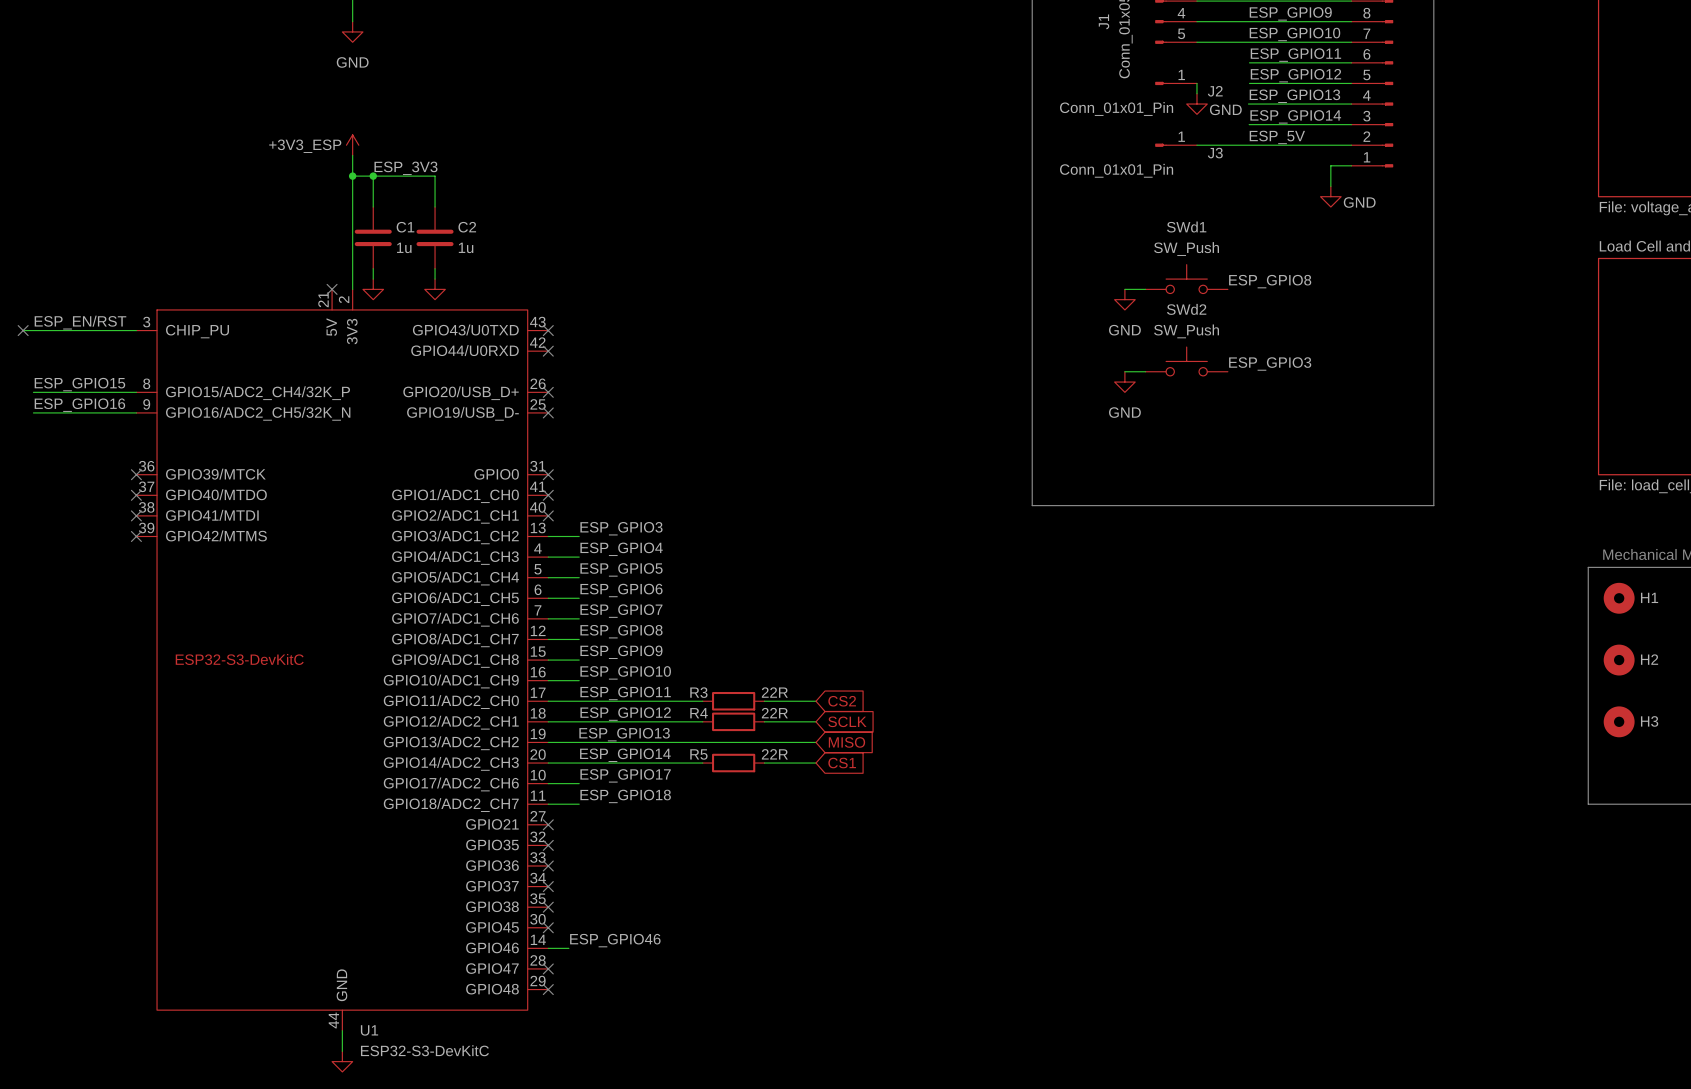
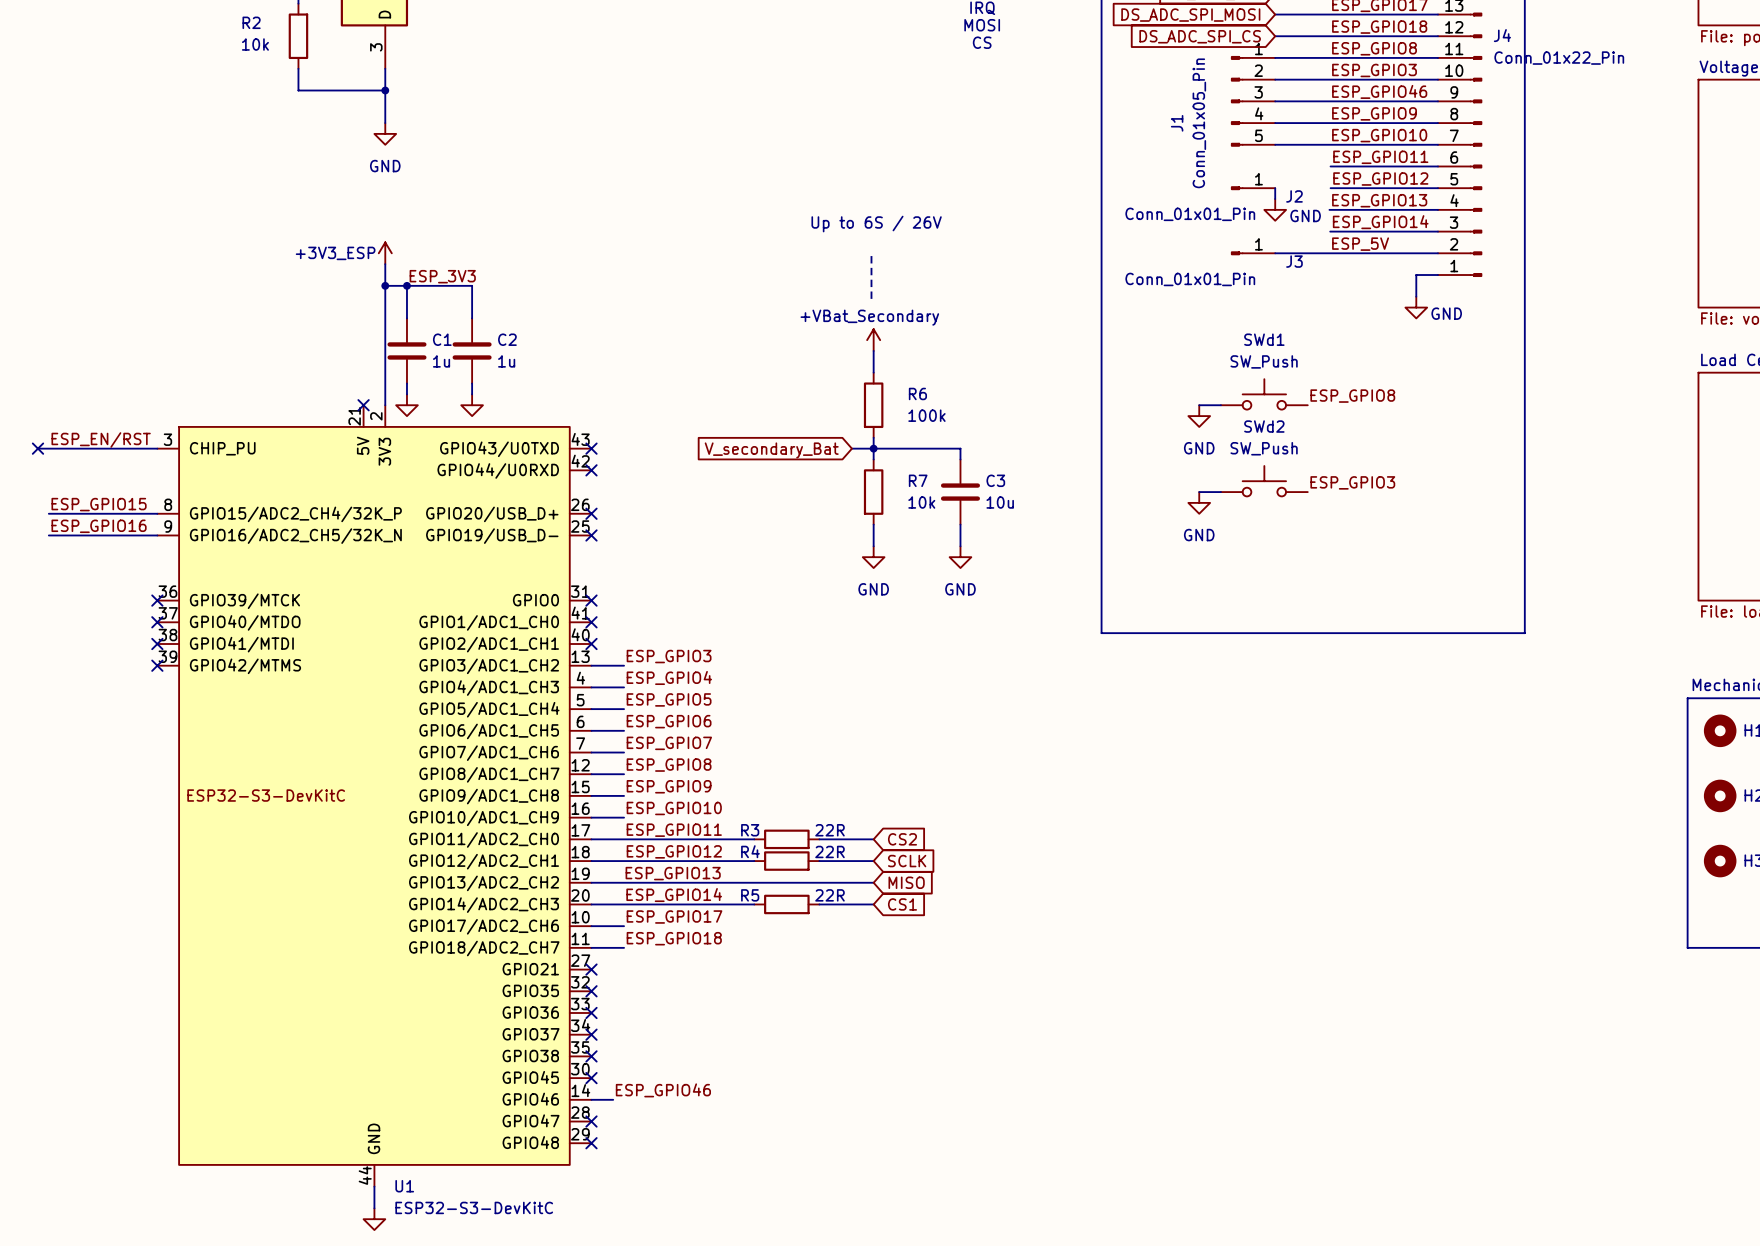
text: none -> Up to 6S / 26V (876, 224)
line: none -> (871, 255) (871, 298)
power symbol: none -> +VBat_Secondary (873, 340)
wire: none -> (873, 350) (873, 372)
R6: none -> 100k (873, 405)
wire: none -> (873, 437) (873, 459)
wire: none -> (851, 448) (960, 448) (960, 459)
junction: none -> (873, 448)
global label: none -> V_secondary_Bat (771, 450)
R7: none -> 10k (873, 492)
C3: none -> 10u (960, 492)
wire: none -> (873, 524) (873, 546)
wire: none -> (960, 524) (960, 546)
power symbol: none -> GND (873, 557)
power symbol: none -> GND (960, 557)

